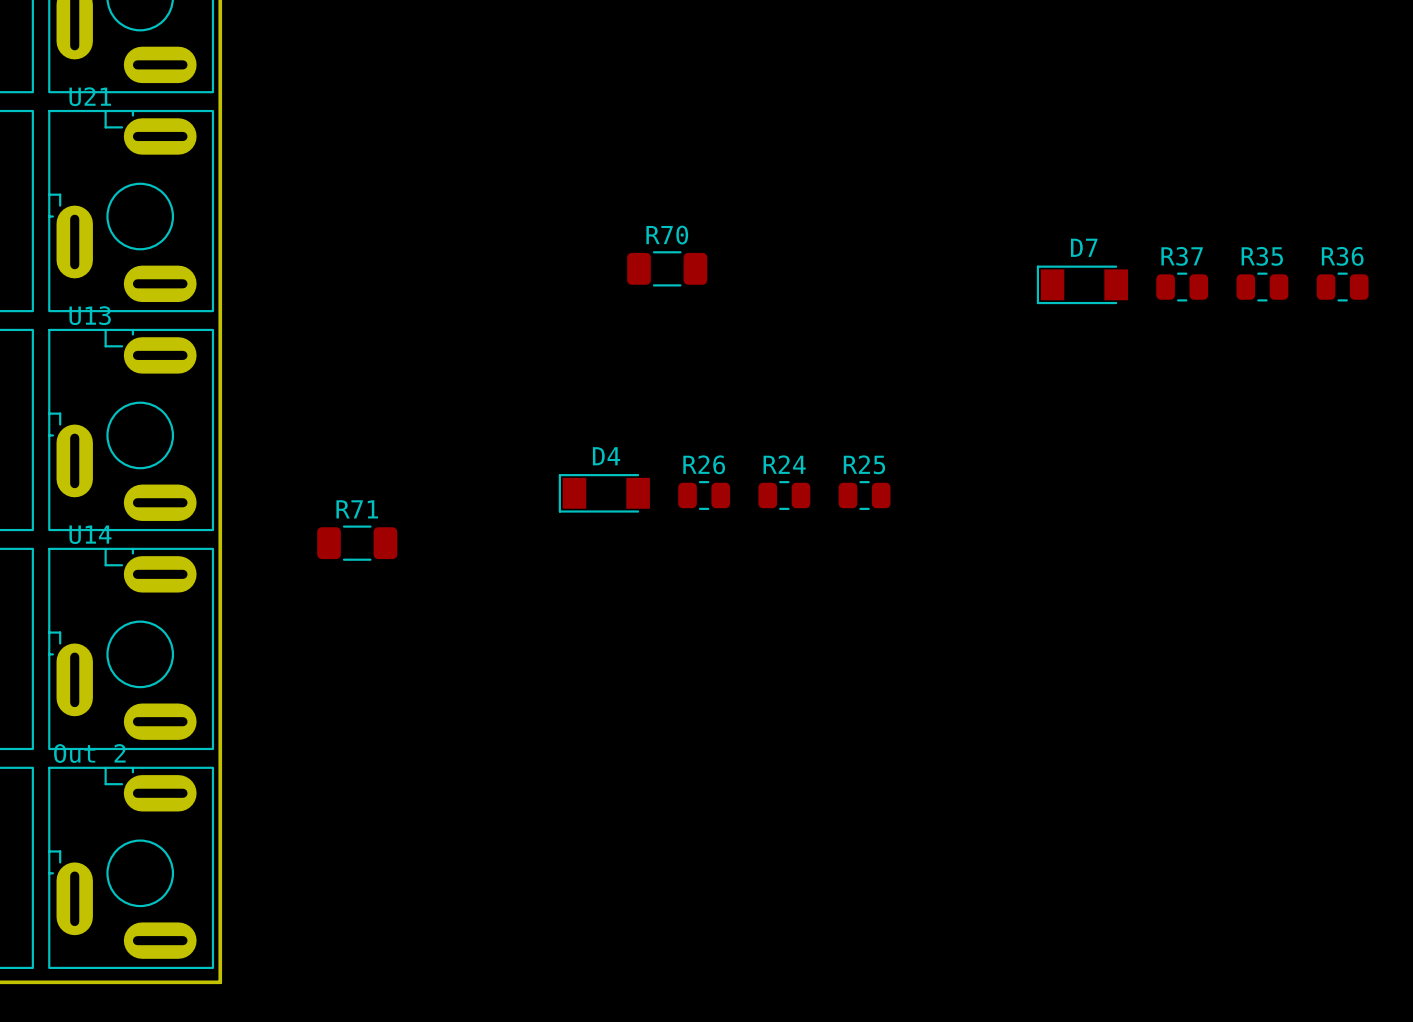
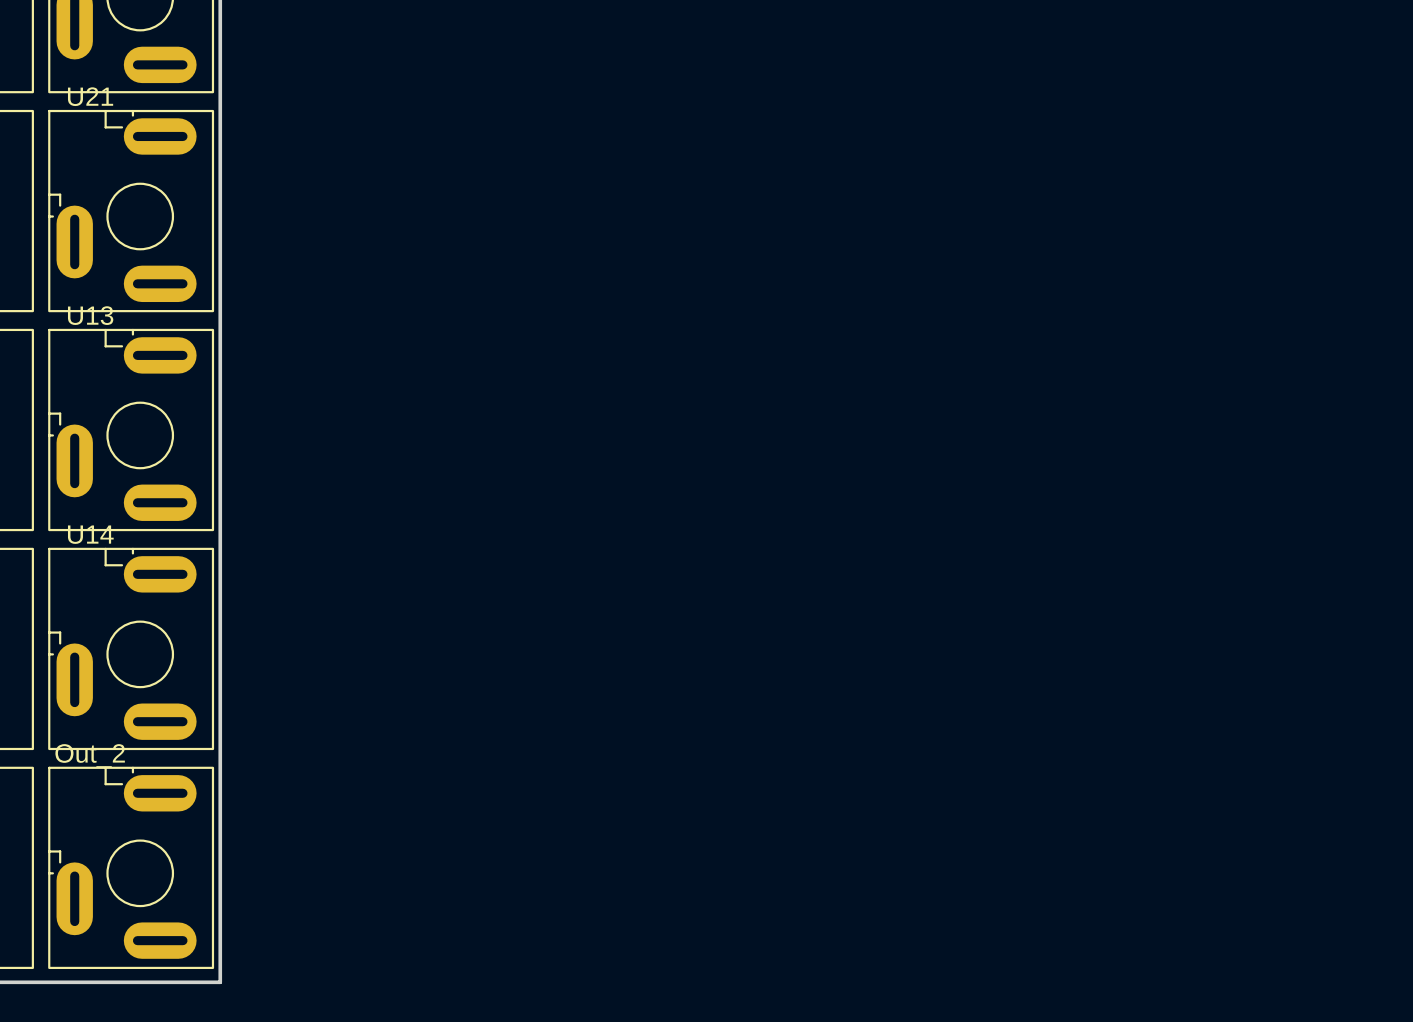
R70: (667, 268) -> none
D7: (1082, 284) -> none
R37: (1182, 287) -> none
R35: (1262, 287) -> none
R36: (1342, 287) -> none
D4: (604, 493) -> none
R26: (704, 495) -> none
R24: (784, 495) -> none
R25: (864, 495) -> none
R71: (357, 543) -> none

